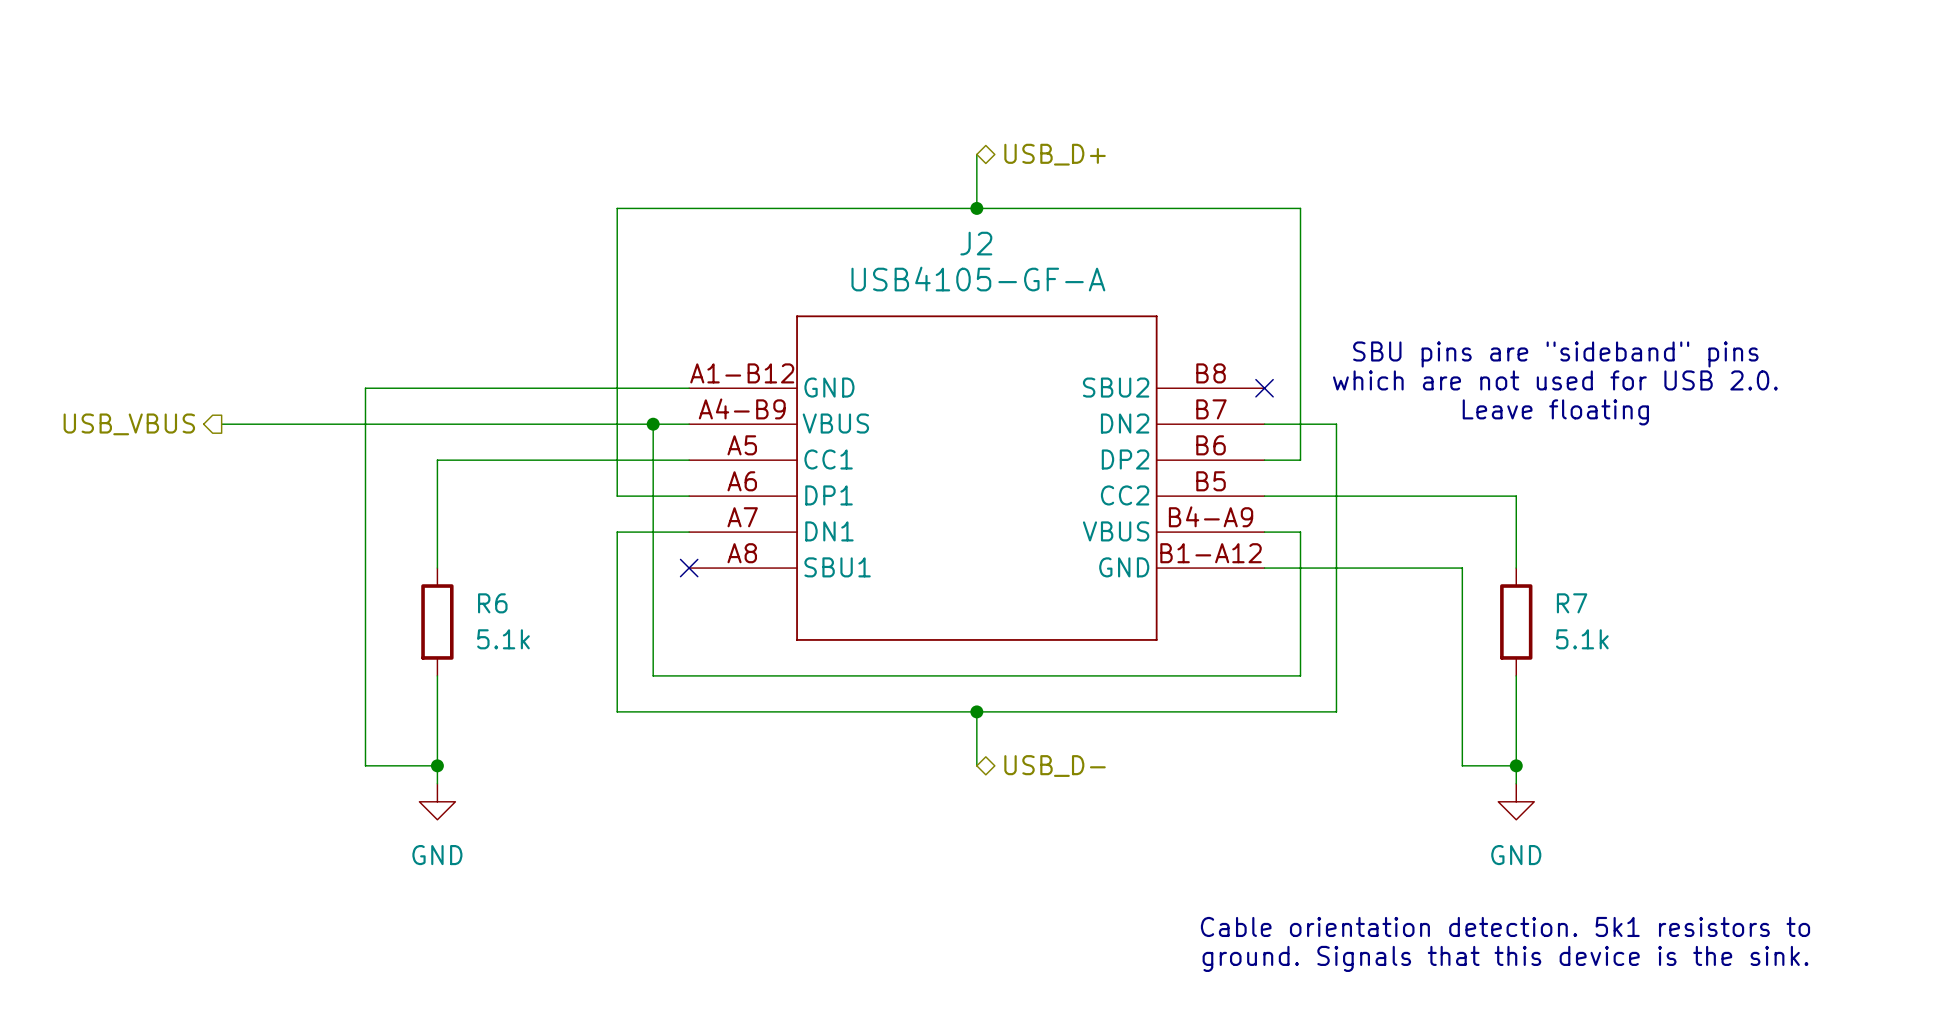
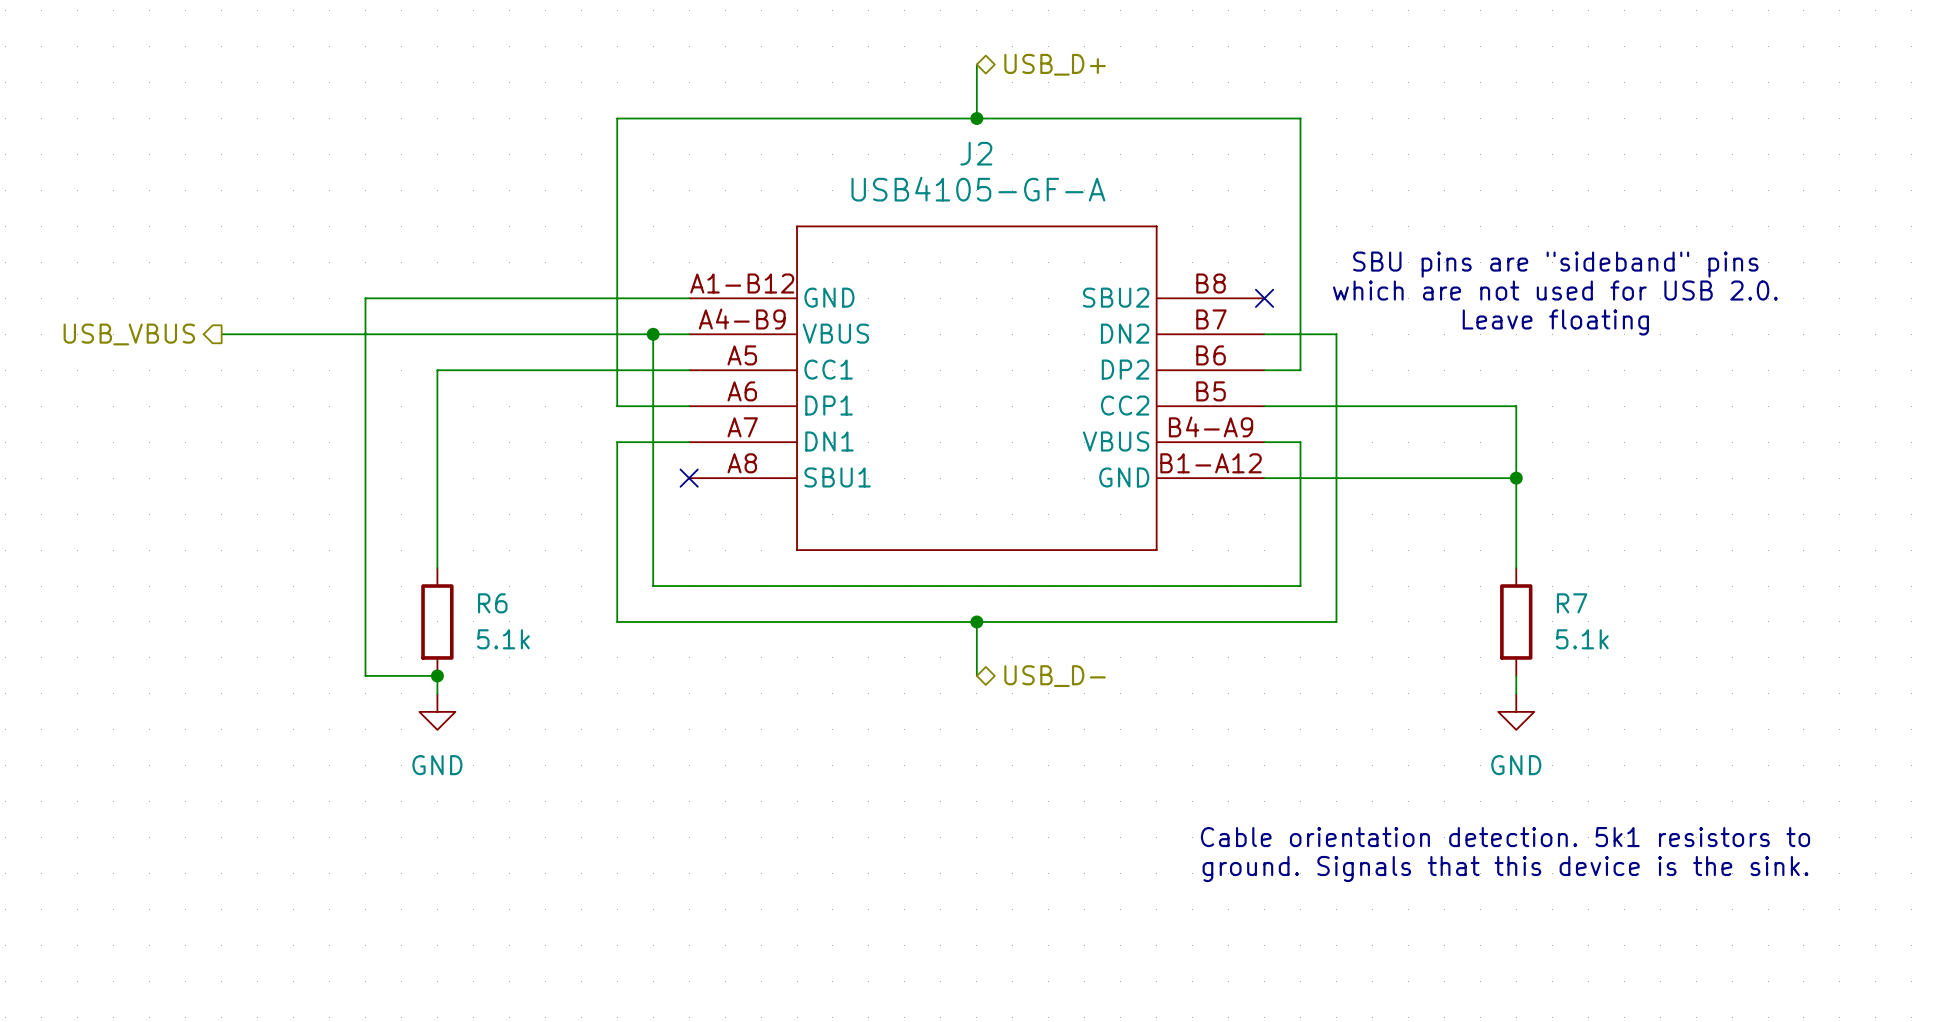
junction: none -> (976, 118)
wire: (976, 154) (976, 208) -> (976, 64) (976, 118)
hierarchical label position: USB_D+ (1055, 154) -> USB_D+ (1055, 64)
wire: (617, 208) (1300, 208) -> (617, 208) (617, 118) (1300, 118) (1300, 208)
junction: (976, 208) -> none
no-connect mark: none -> (1264, 298)
wire: none -> (653, 334) (653, 424)
junction: none -> (653, 334)
text position: SBU pins are "sideband" pins (1555, 354) -> SBU pins are "sideband" pins (1555, 264)
wire: (1300, 370) (1300, 442) -> (1300, 370) (1264, 370)
text position: which are not used for USB 2.0. (1555, 380) -> which are not used for USB 2.0. (1555, 290)
wire: (365, 388) (689, 388) -> (365, 388) (365, 298) (689, 298)
no-connect mark: (1264, 388) -> none
wire: (617, 406) (617, 442) -> (617, 406) (689, 406)
text position: Leave floating (1555, 412) -> Leave floating (1555, 322)
hierarchical label position: USB_VBUS (129, 424) -> USB_VBUS (129, 334)
wire: (221, 424) (689, 424) -> (221, 334) (689, 334)
junction: (653, 424) -> none
wire: (1264, 424) (1336, 424) -> (1264, 334) (1336, 334) (1336, 424)
wire: (437, 460) (689, 460) -> (437, 460) (437, 370) (689, 370)
wire: (1264, 460) (1300, 460) -> (1300, 532) (1300, 460)
no-connect mark: none -> (689, 478)
J2 position: (976, 478) -> (976, 388)
wire: none -> (1264, 478) (1516, 478)
junction: none -> (1516, 478)
wire: (617, 496) (689, 496) -> (617, 496) (617, 532)
wire: (1264, 496) (1516, 496) -> (1264, 406) (1516, 406) (1516, 496)
wire: (617, 532) (689, 532) -> (617, 442) (689, 442)
wire: (1264, 532) (1300, 532) -> (1264, 442) (1300, 442)
no-connect mark: (689, 568) -> none
wire: (1264, 568) (1462, 568) (1462, 765) (1516, 765) -> none
wire: (653, 586) (653, 675) (1300, 675) (1300, 586) -> (653, 586) (1300, 586)
wire: (617, 621) (617, 711) (1336, 711) (1336, 621) -> (617, 621) (1336, 621)
junction: none -> (976, 621)
wire: (365, 675) (365, 765) (437, 765) -> (365, 675) (437, 675)
junction: none -> (437, 675)
wire: (437, 693) (437, 783) -> none
wire: (1516, 693) (1516, 783) -> none
wire: (976, 711) (976, 765) -> (976, 621) (976, 675)
junction: (976, 711) -> none
junction: (437, 765) -> none
junction: (1516, 765) -> none
hierarchical label position: USB_D- (1055, 766) -> USB_D- (1055, 676)
power symbol position: GND (437, 801) -> GND (437, 711)
power symbol position: GND (1516, 801) -> GND (1516, 711)
text position: Cable orientation detection. 5k1 resistors to (1505, 926) -> Cable orientation detection. 5k1 resistors to (1505, 837)
text position: ground. Signals that this device is the sink. (1505, 958) -> ground. Signals that this device is the sink. (1505, 869)

